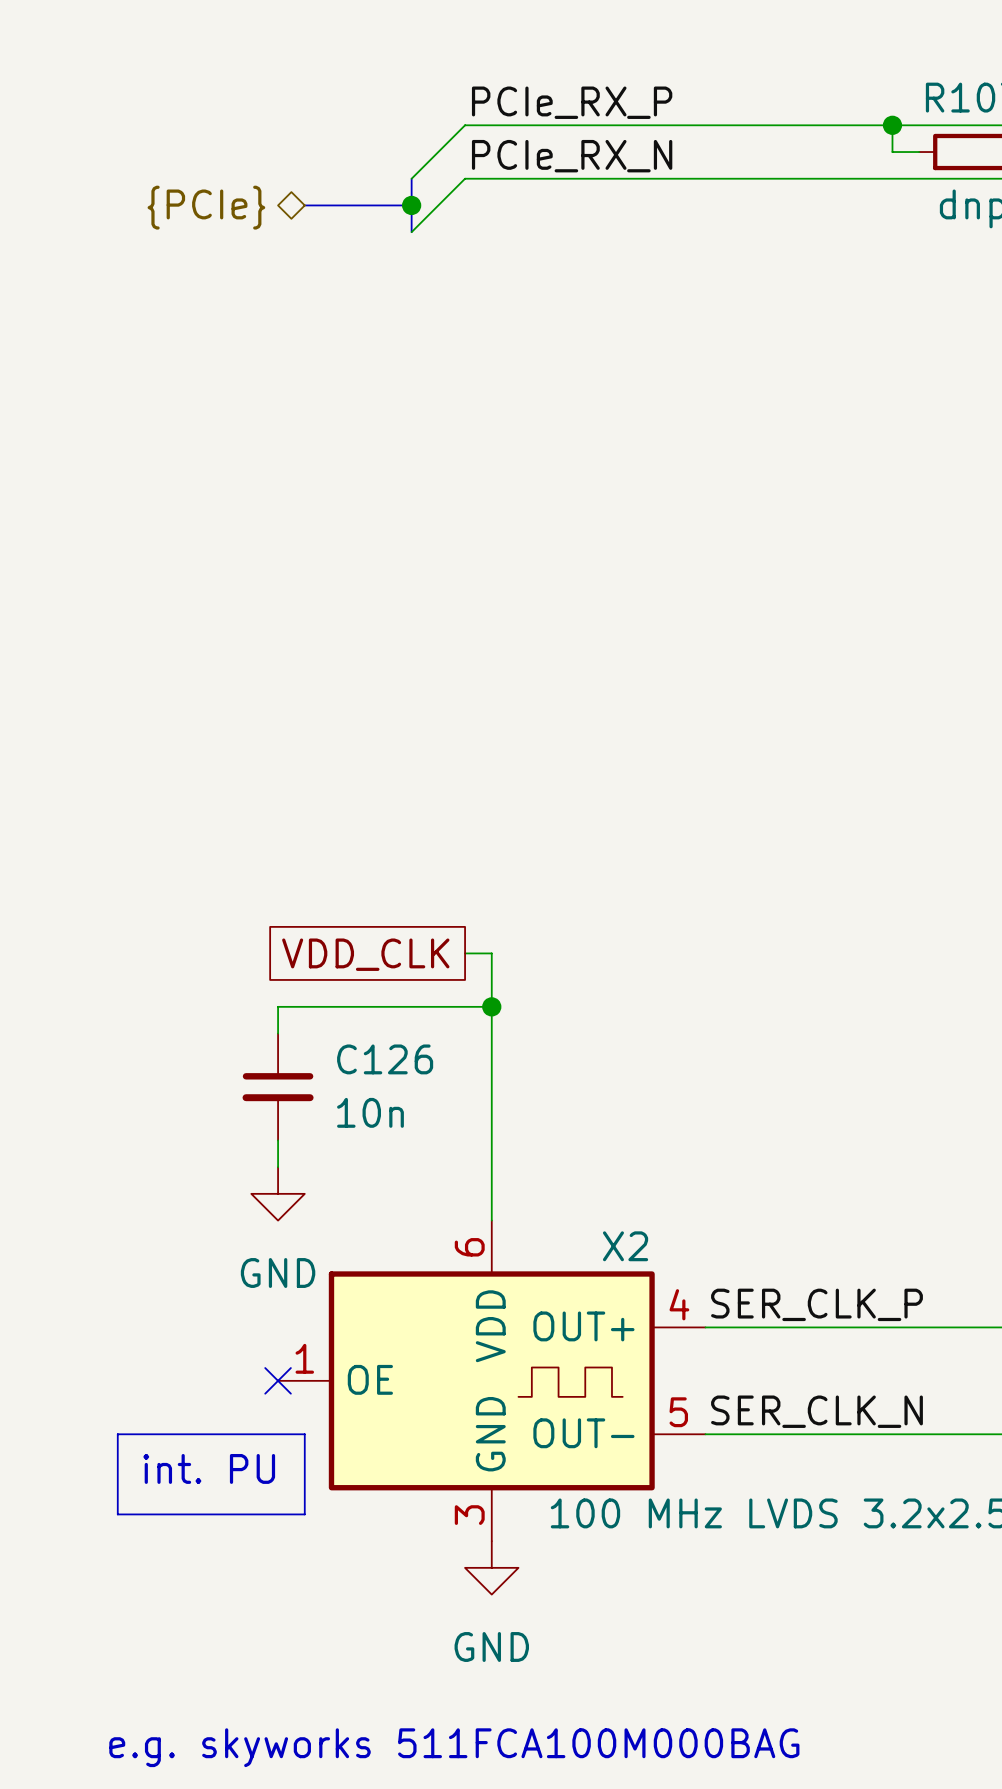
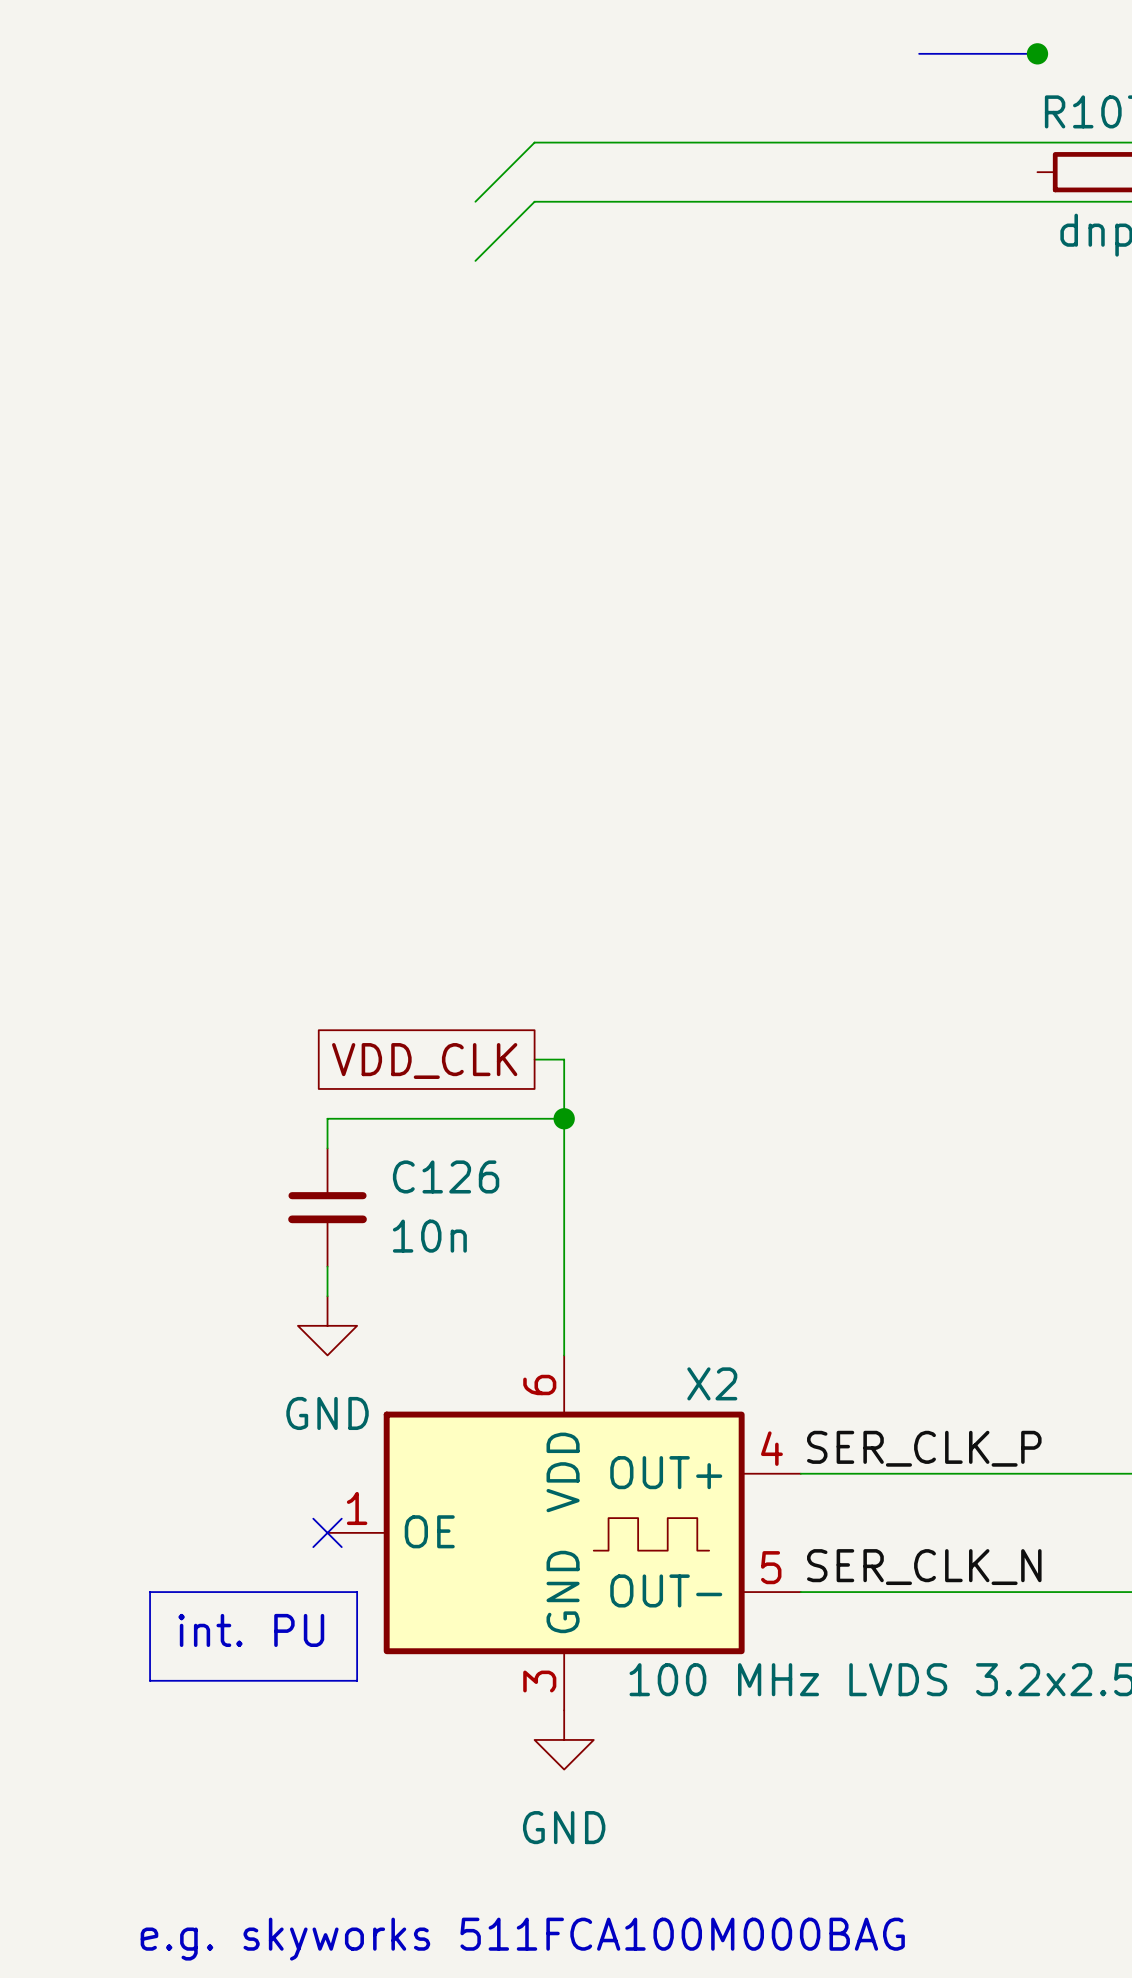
bus: none -> (919, 53) (1037, 53)
label: PCIe_RX_P (572, 102) -> none
wire: (892, 125) (892, 152) (919, 152) -> none
junction position: (892, 125) -> (1037, 53)
label: PCIe_RX_N (572, 156) -> none
bus: (411, 178) (411, 232) -> none
bus: (304, 205) (411, 205) -> none
junction: (411, 205) -> none
hierarchical label: {PCIe} (206, 207) -> none

